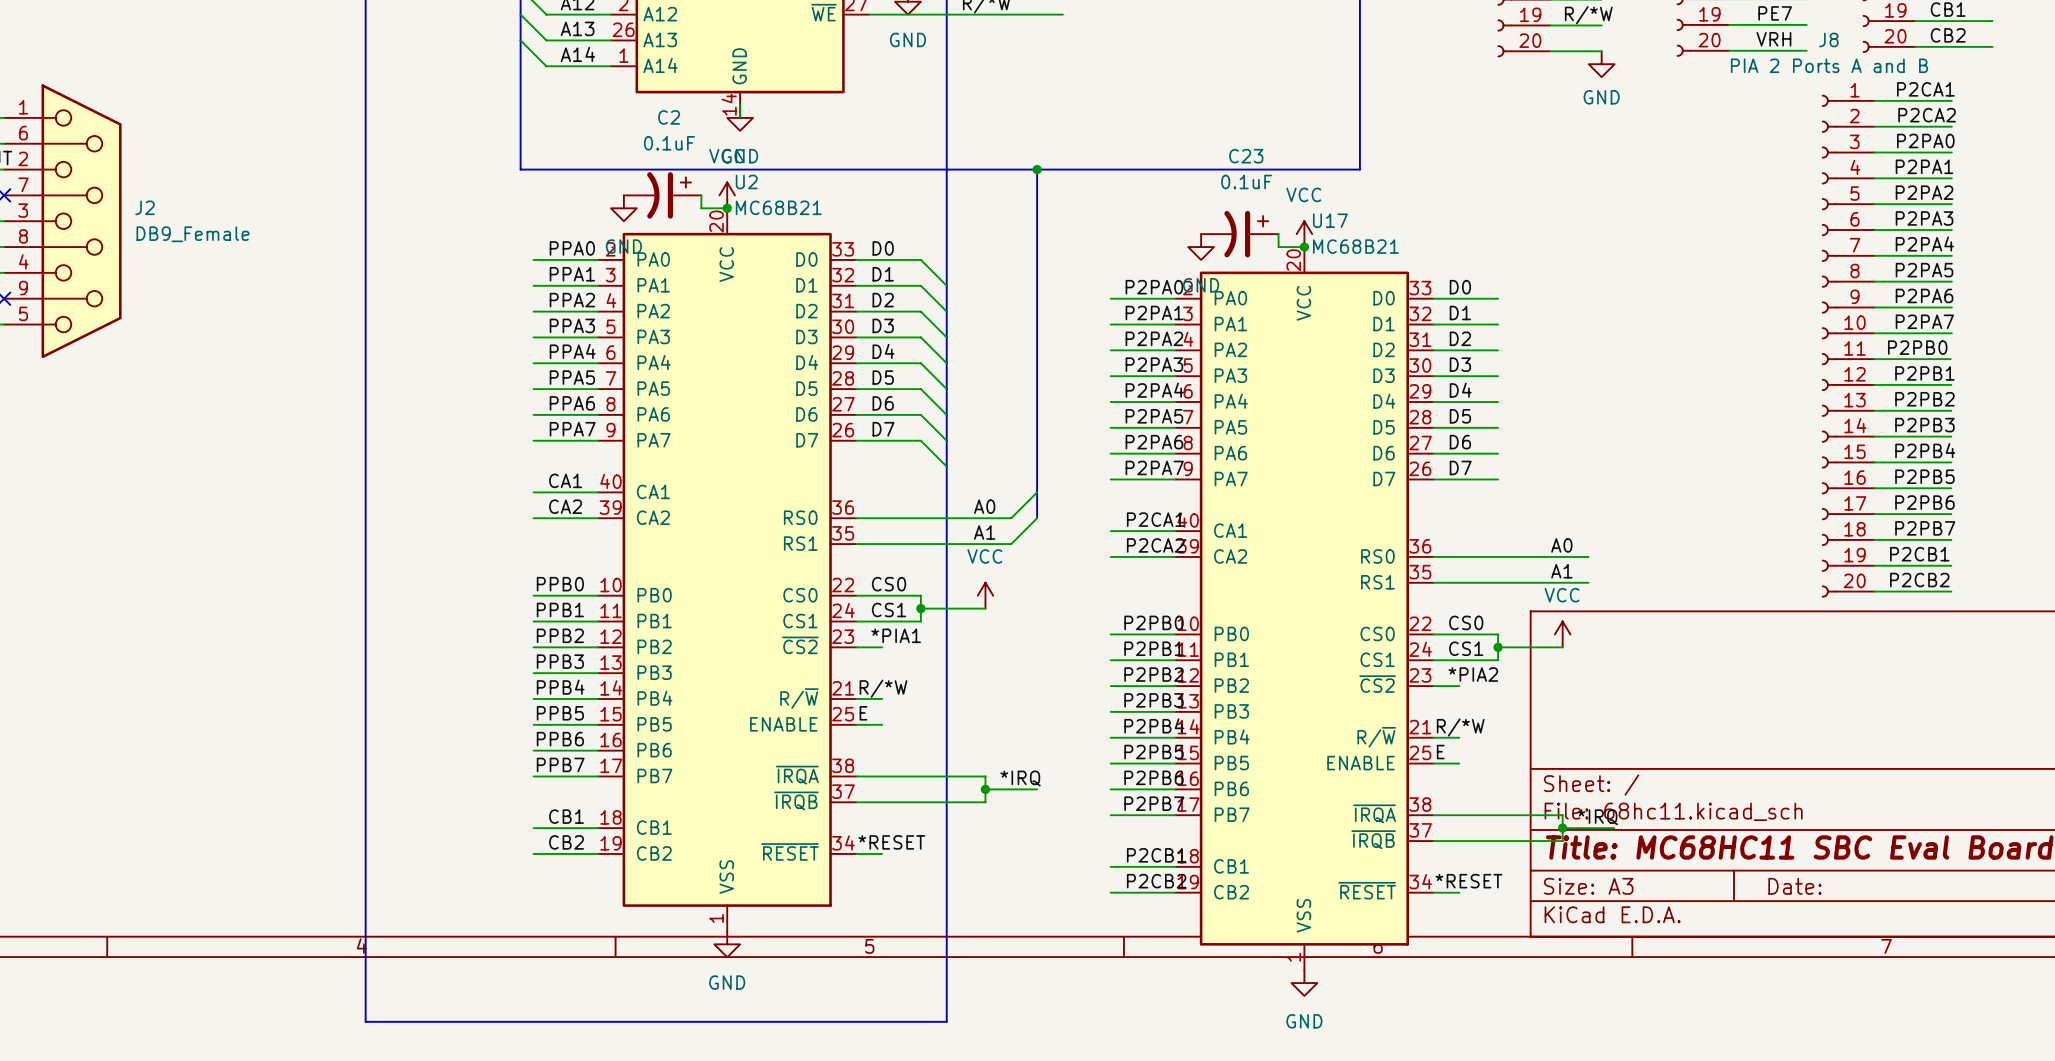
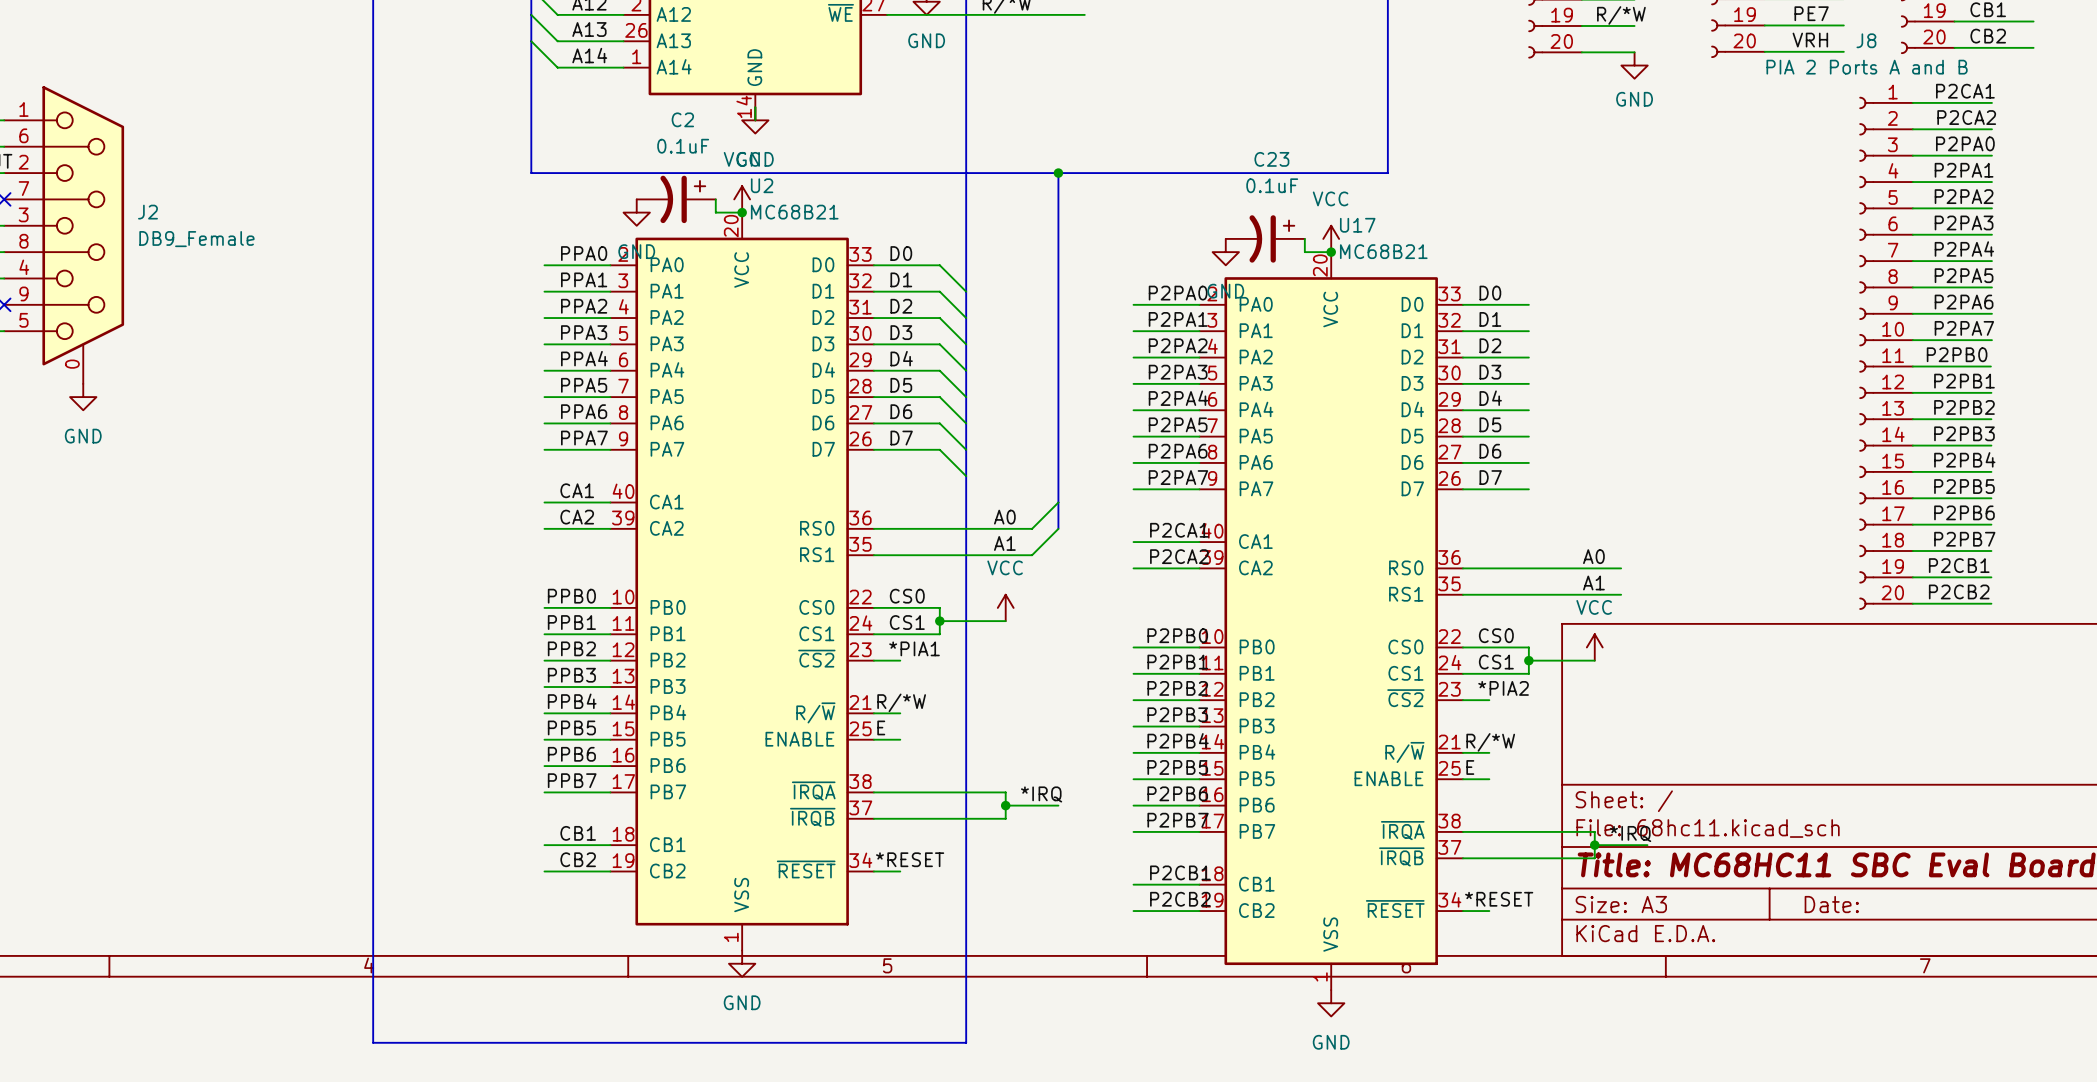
J2 symbol: [4, 84, 122, 359] -> [4, 86, 125, 384]
power symbol: none -> GND (83, 397)

